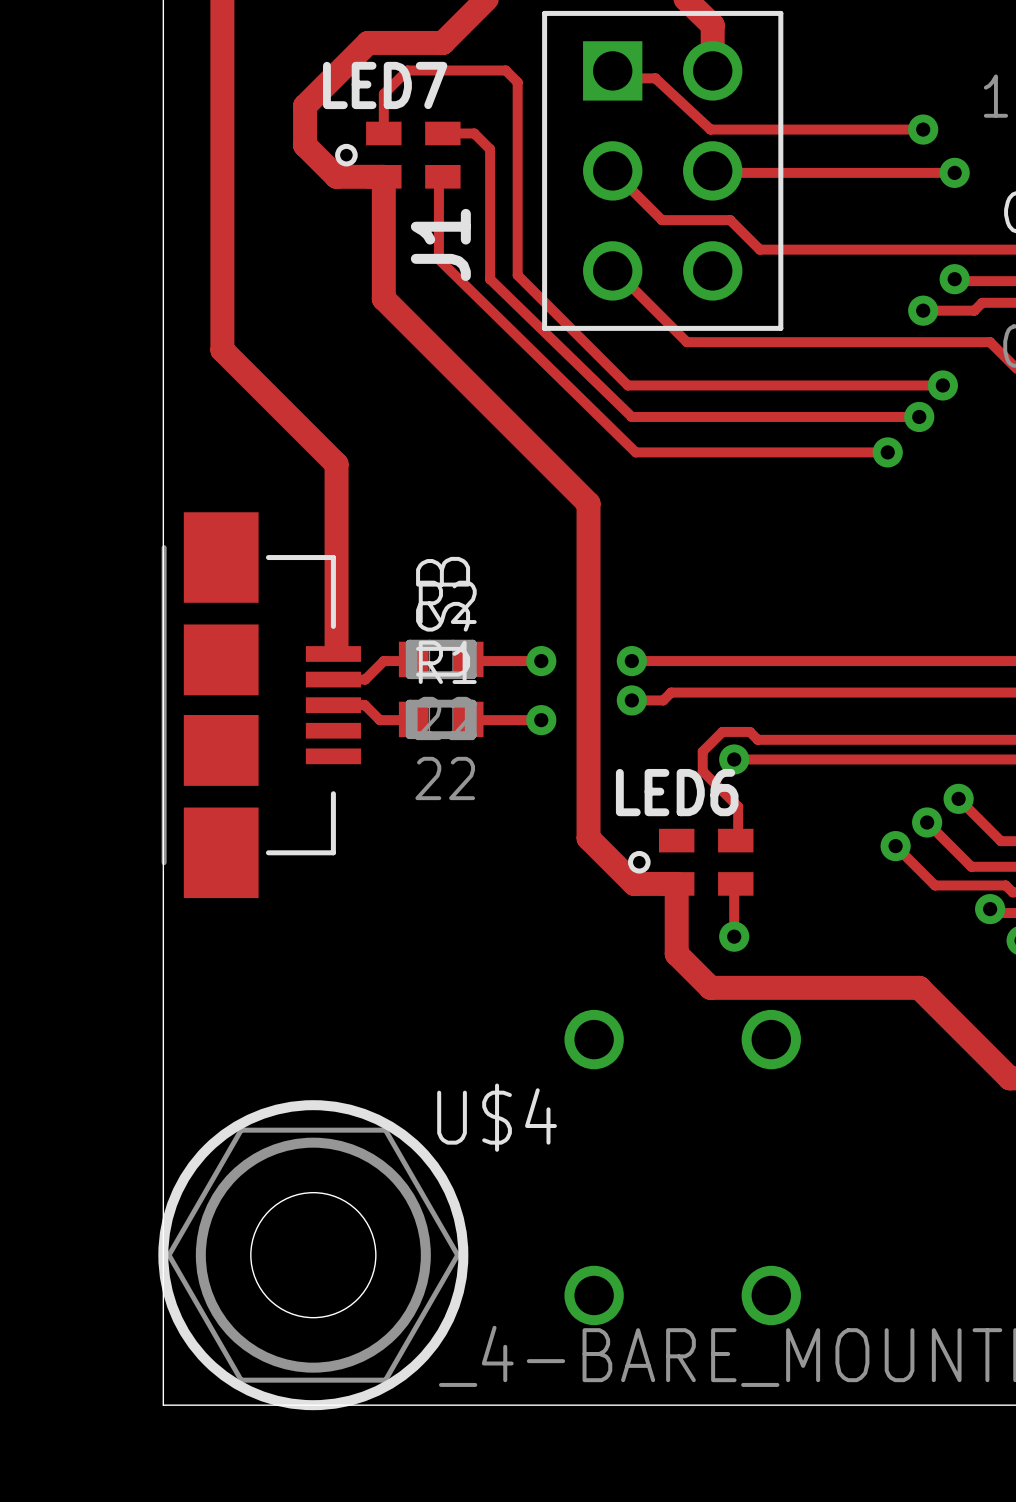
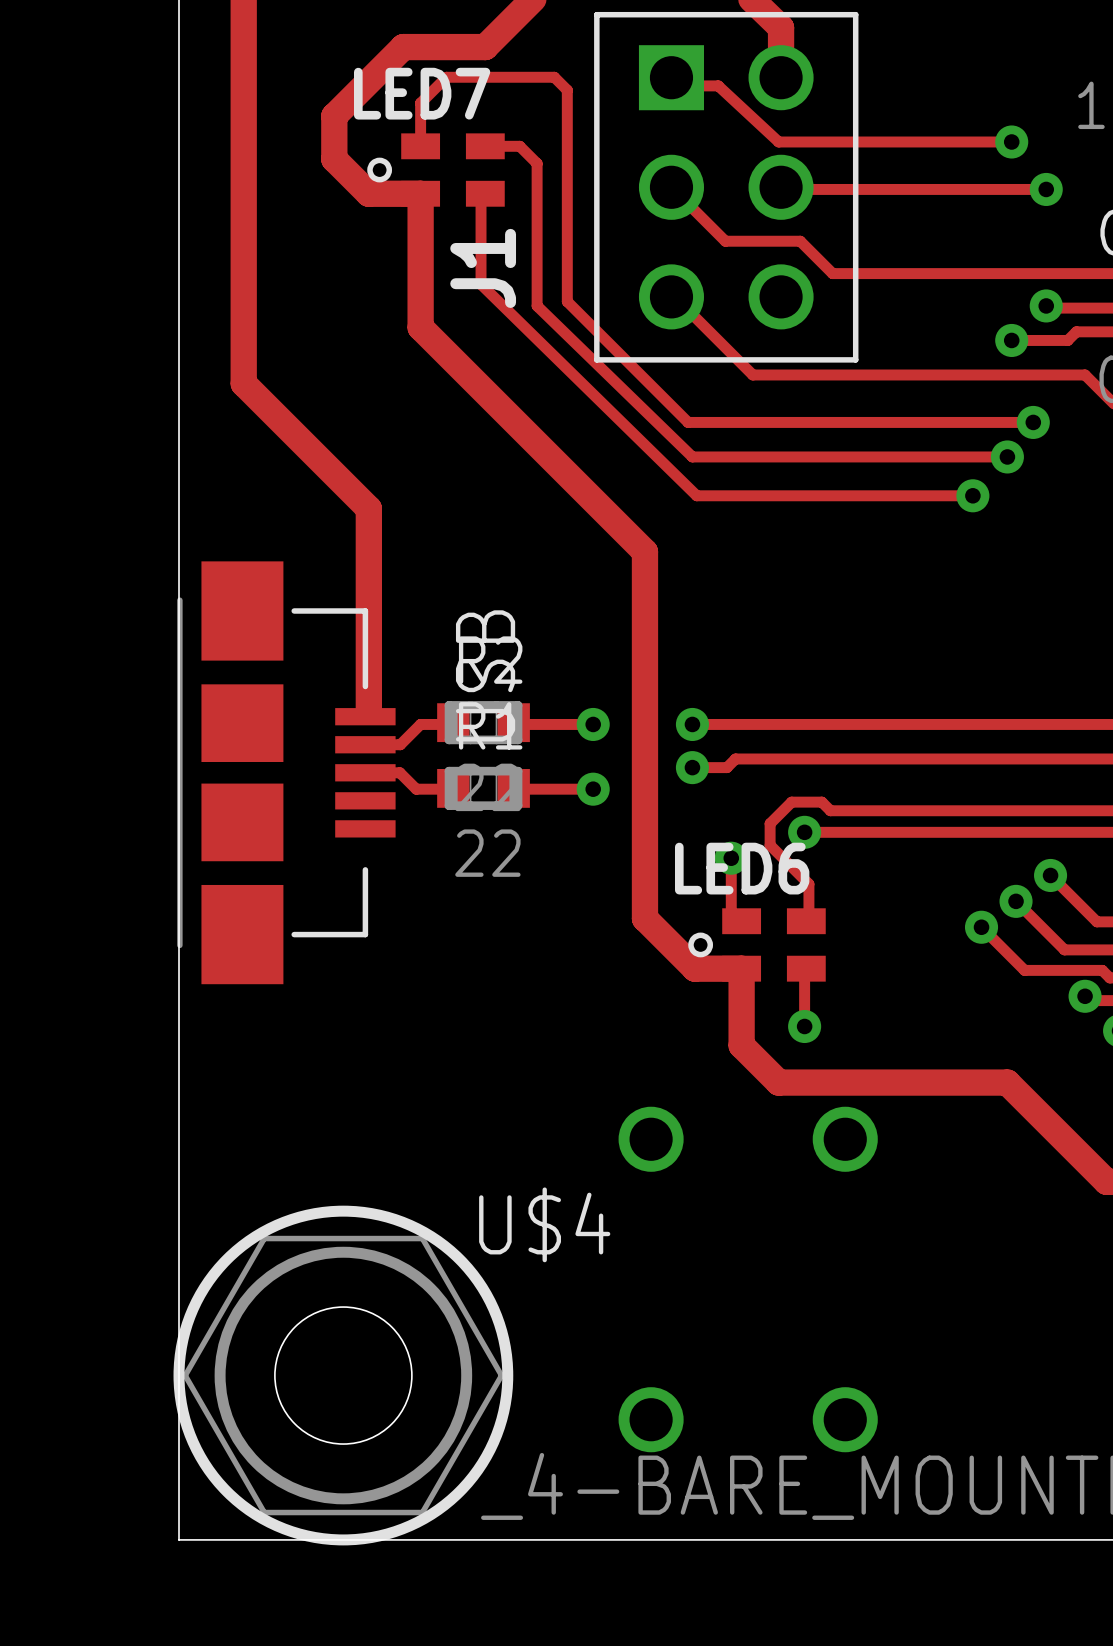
track: none -> (731, 858) (731, 910) (741, 921)
via: none -> (731, 858)

